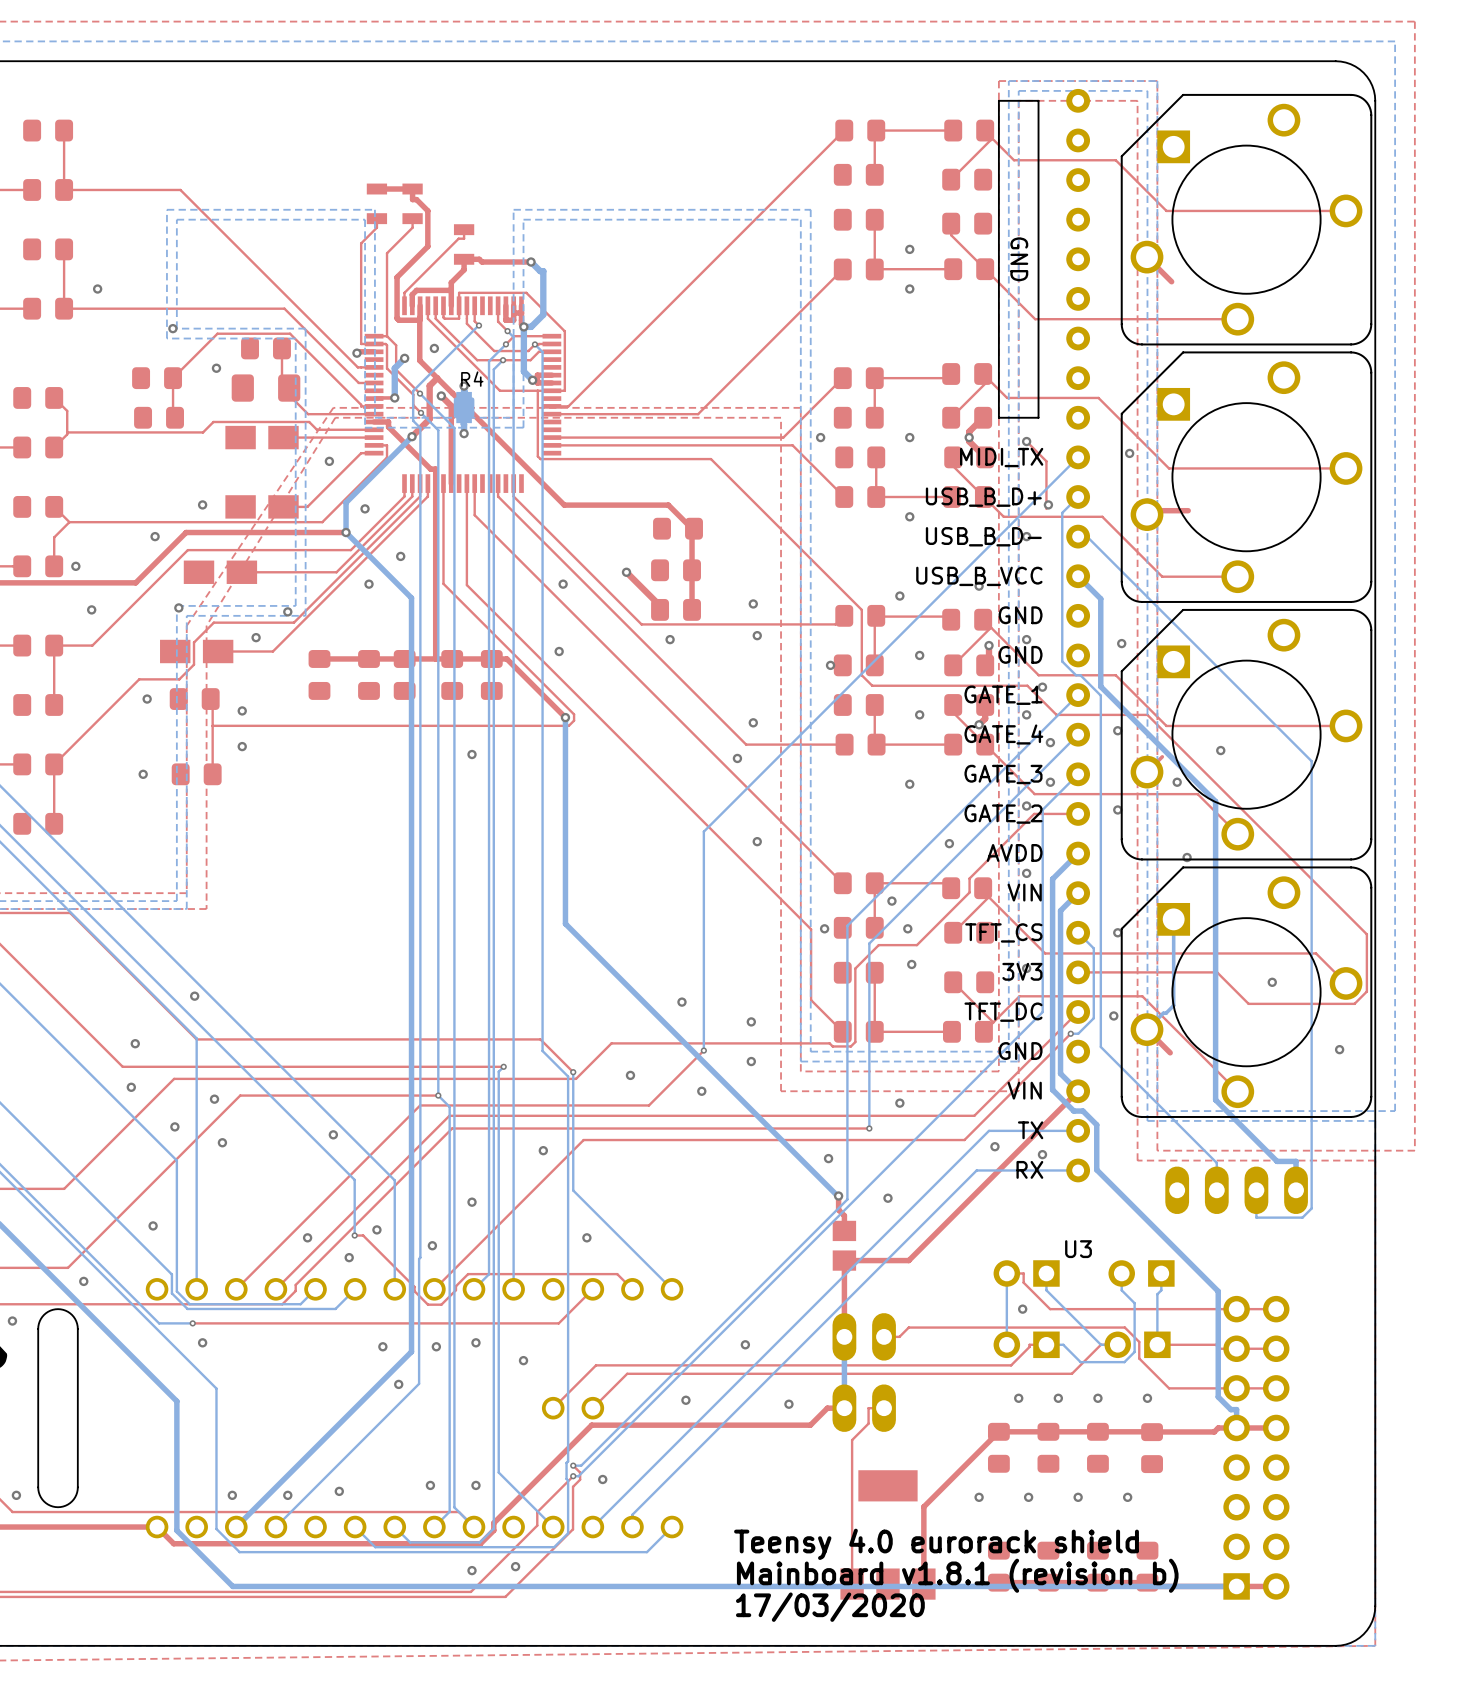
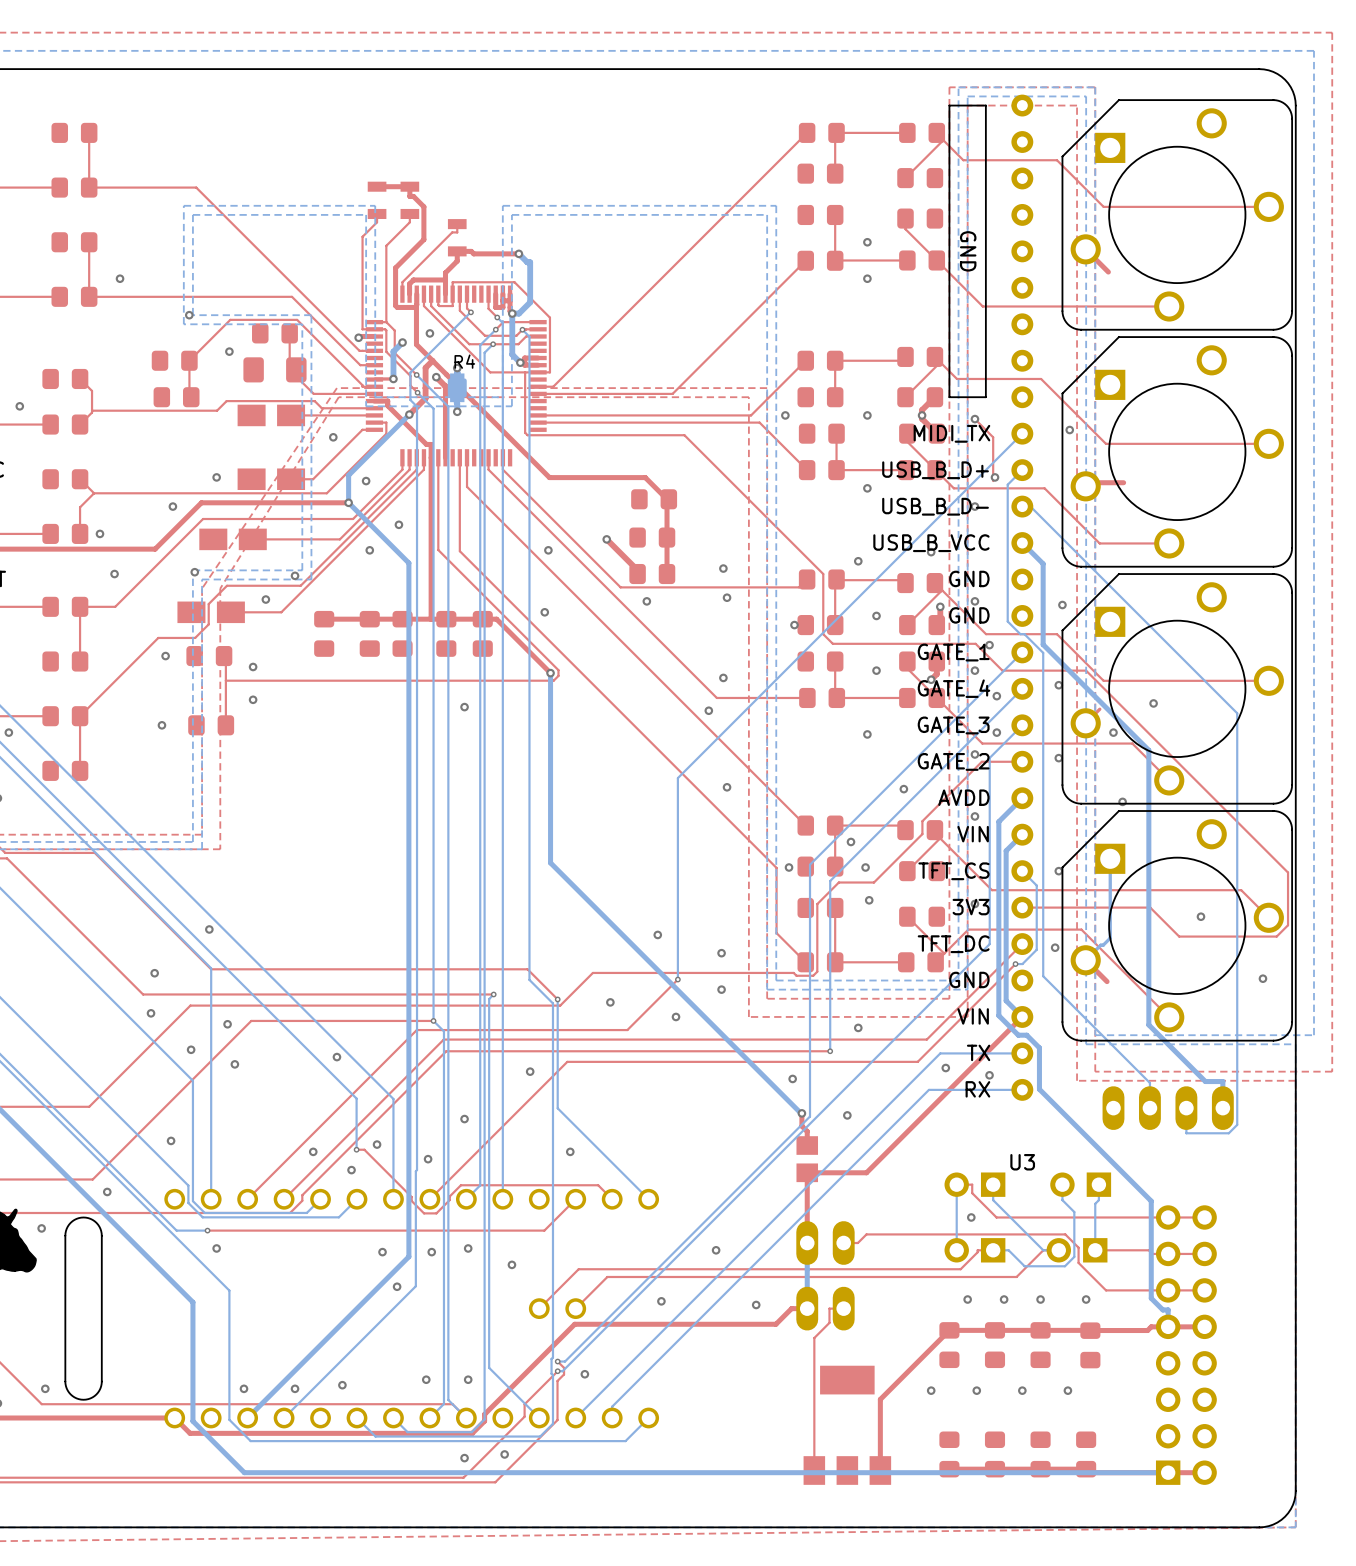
text: Teensy 4.0 eurorack shield (936, 1544) -> none
text: Mainboard v1.8.1 (revision b) (957, 1575) -> none
text: 17/03/2020 (830, 1607) -> none

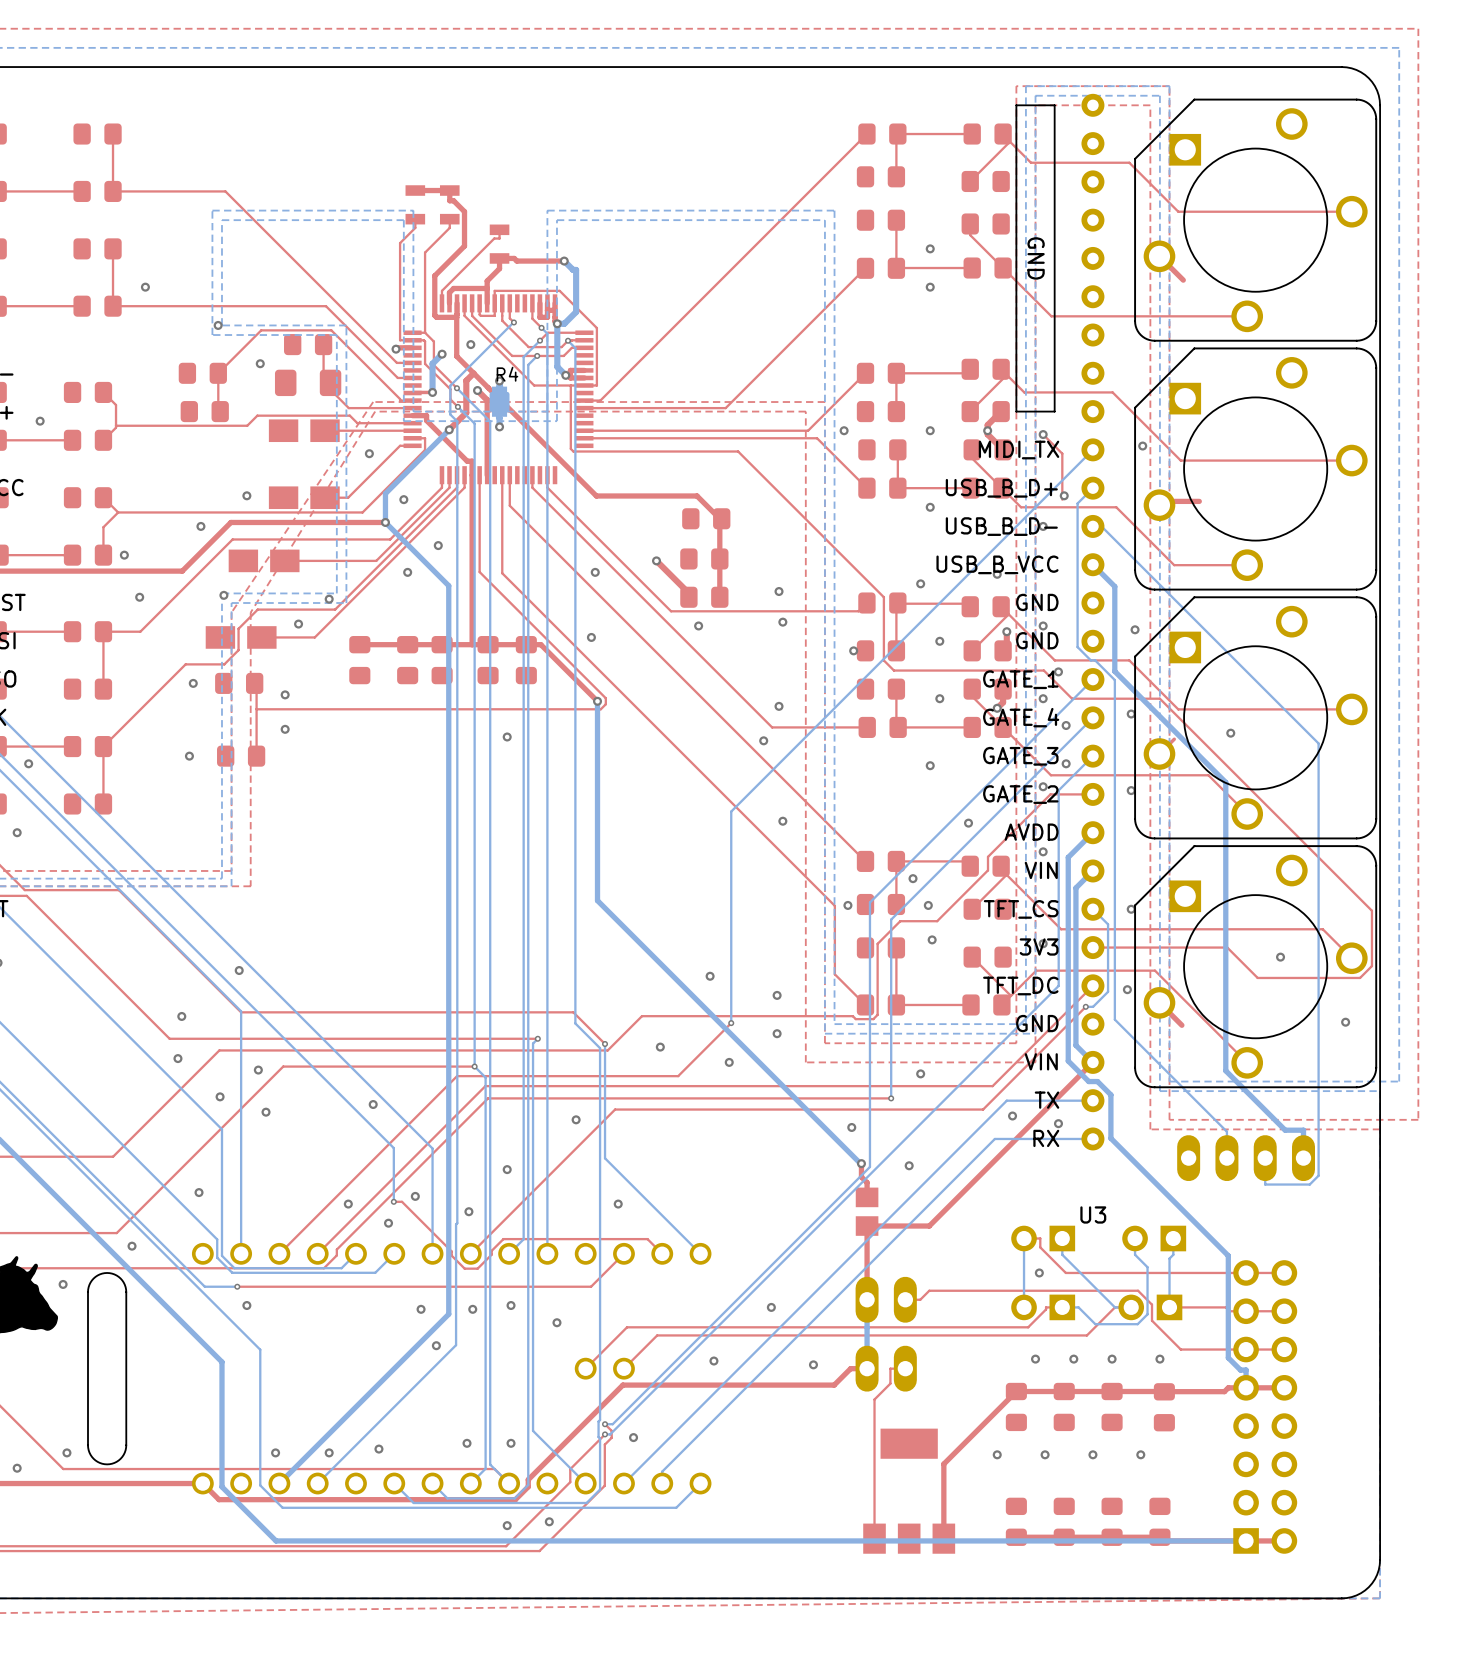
via: (1113, 732) -> none
via: (1122, 801) -> none
bottom track: (1110, 858) (1110, 938) (1085, 960) -> none

